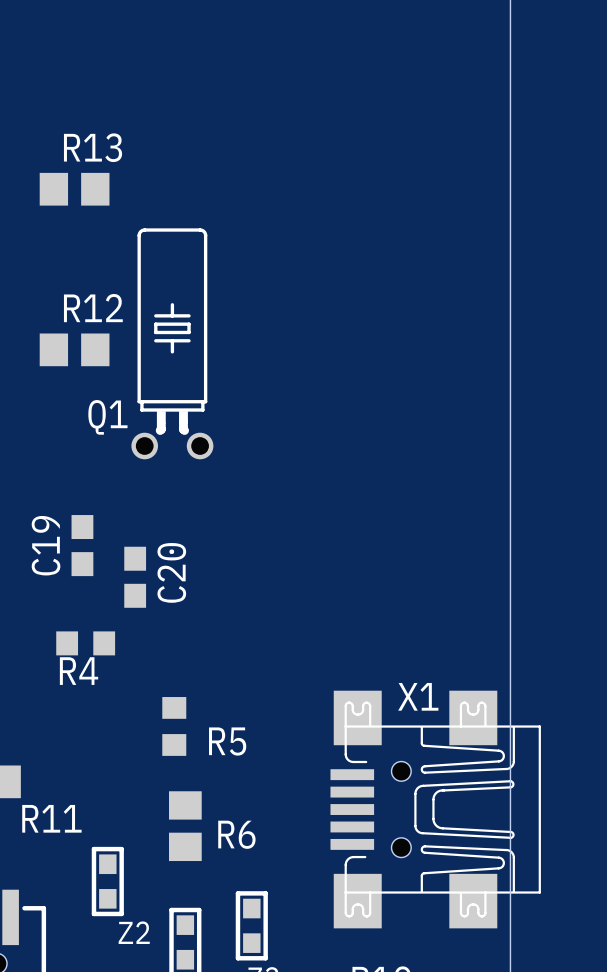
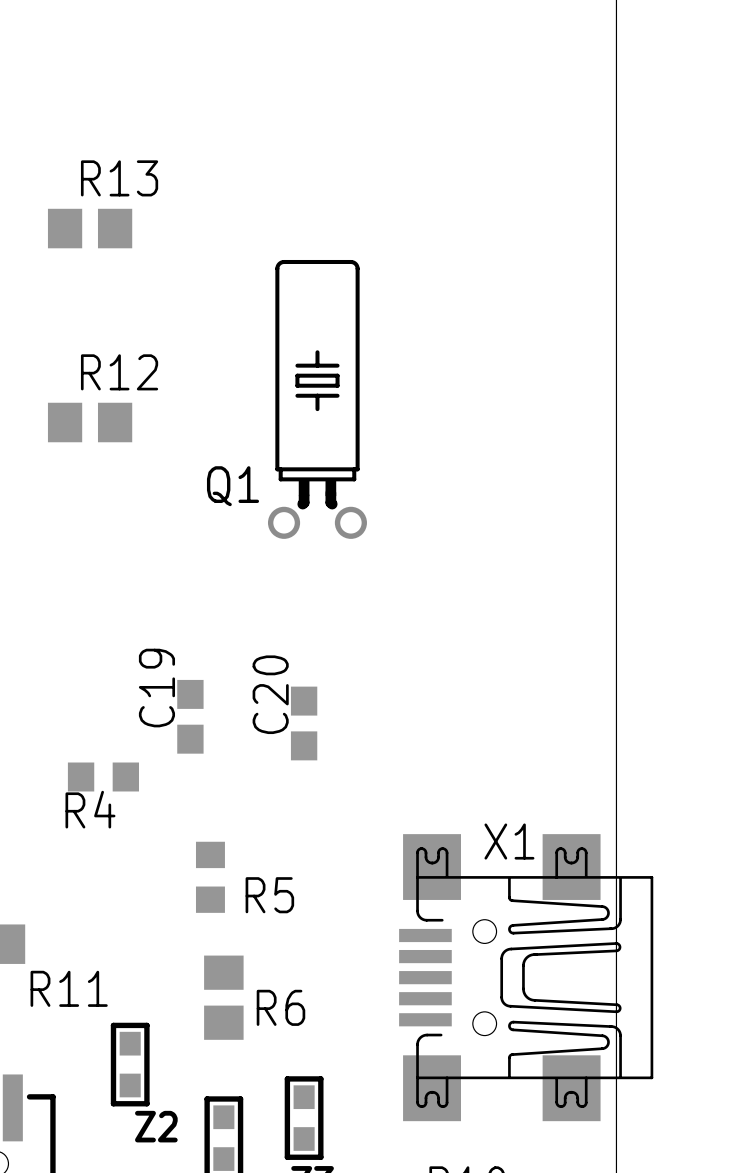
Q1 position: (172, 343) -> (317, 399)
C19 name position: C19 (46, 545) -> C19 (156, 688)
C19 position: (82, 545) -> (190, 716)
C20 name position: C20 (171, 572) -> C20 (270, 694)
C20 position: (135, 577) -> (304, 723)

